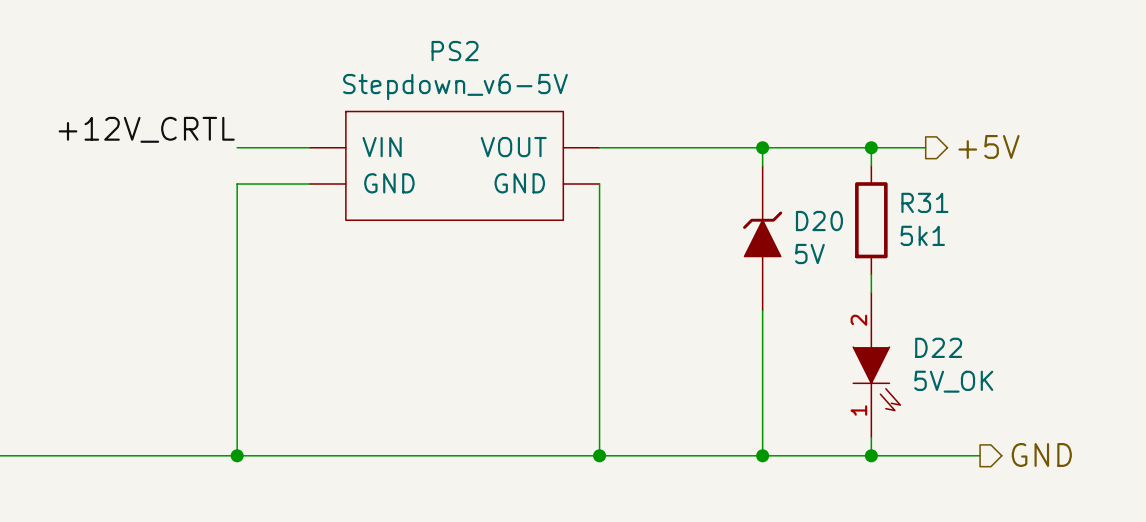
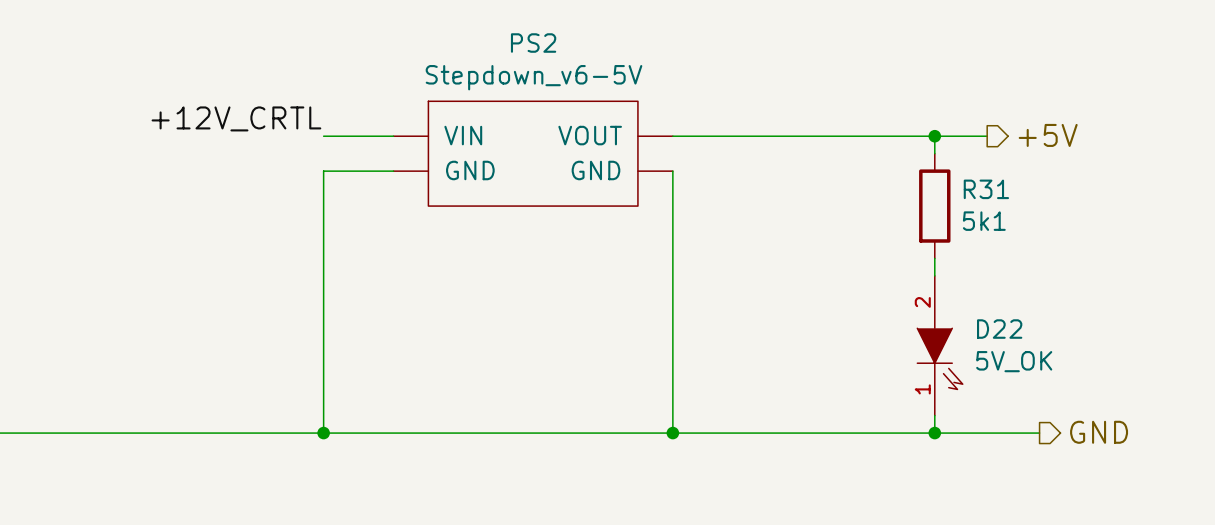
wire: (762, 147) (762, 165) -> none
junction: (762, 147) -> none
D20: 5V (762, 238) -> none
wire: (762, 310) (762, 455) -> none
junction: (762, 455) -> none

